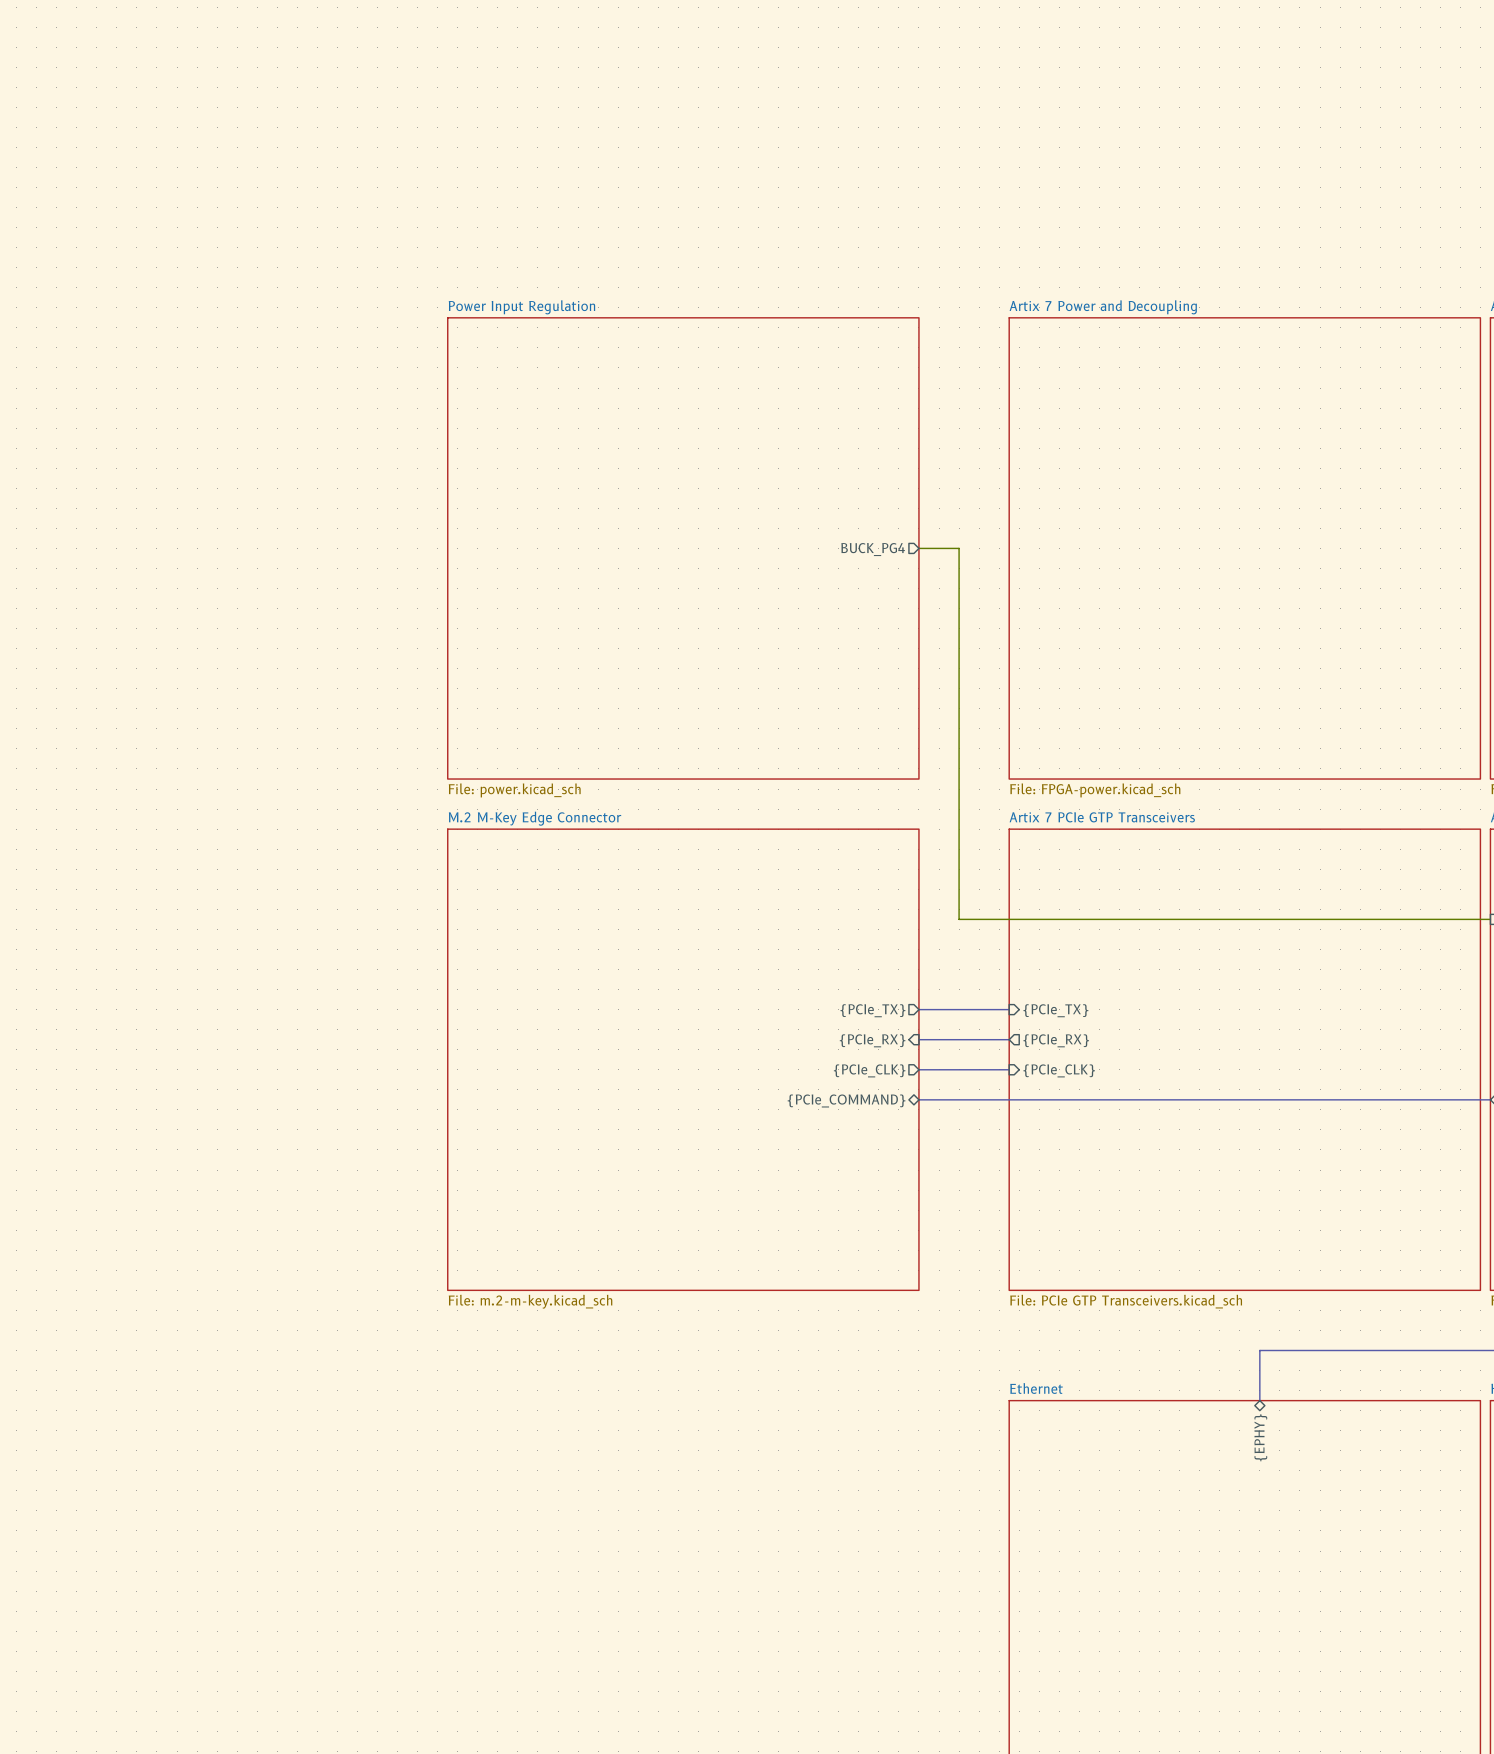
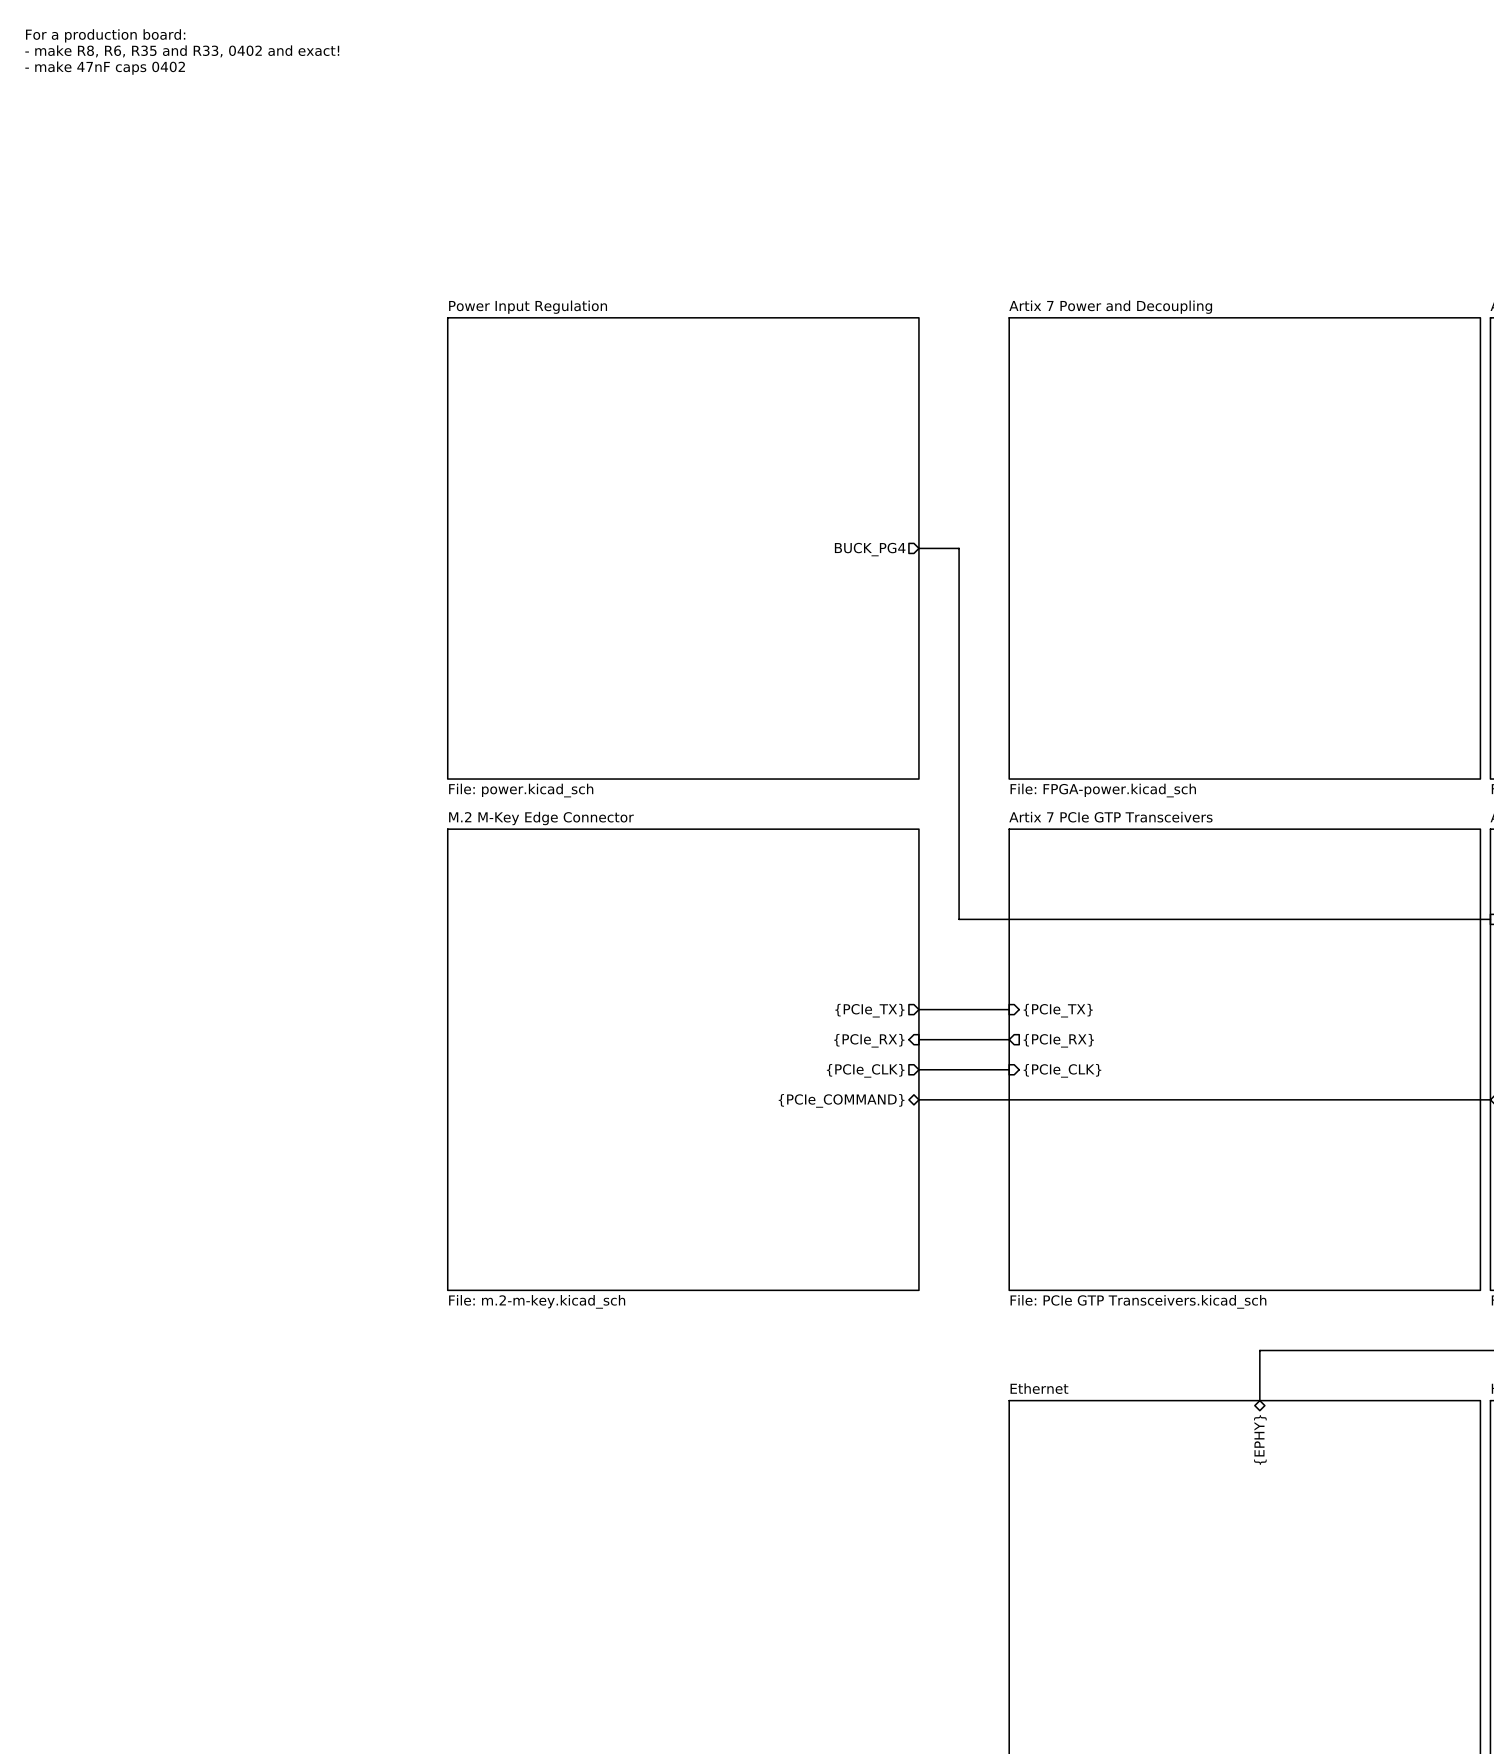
text: none -> For a production board: (105, 35)
text: none -> - make R8, R6, R35 and R33, 0402 and exact! (182, 51)
text: none -> - make 47nF caps 0402 (105, 68)

